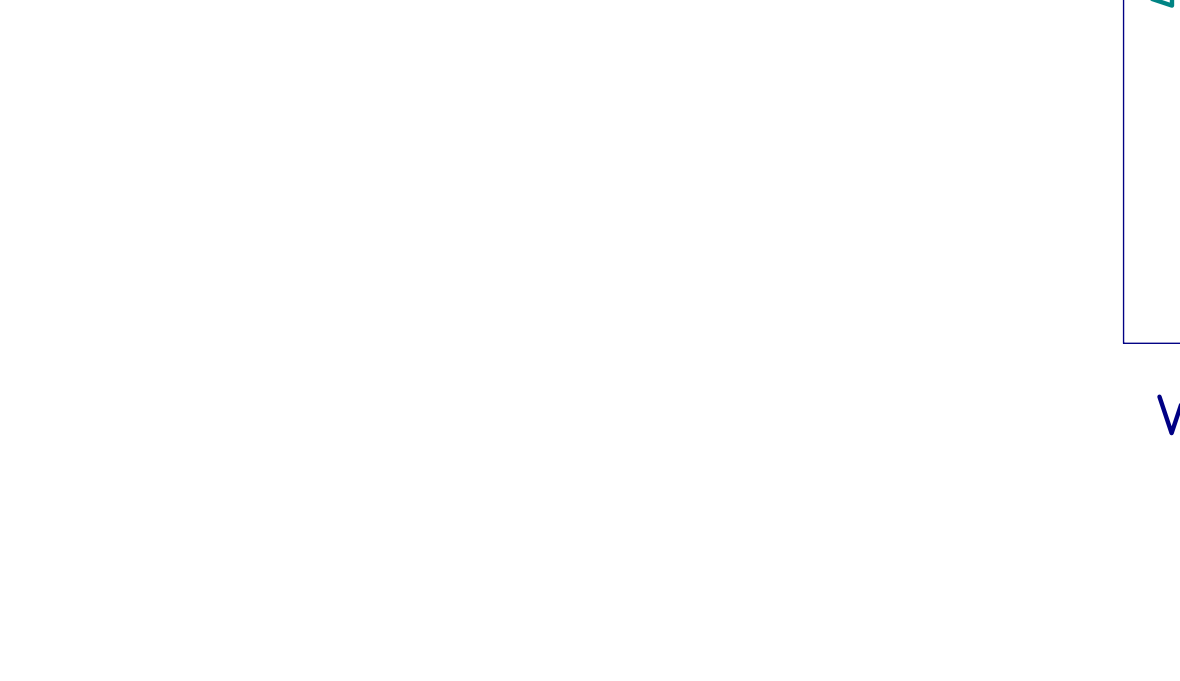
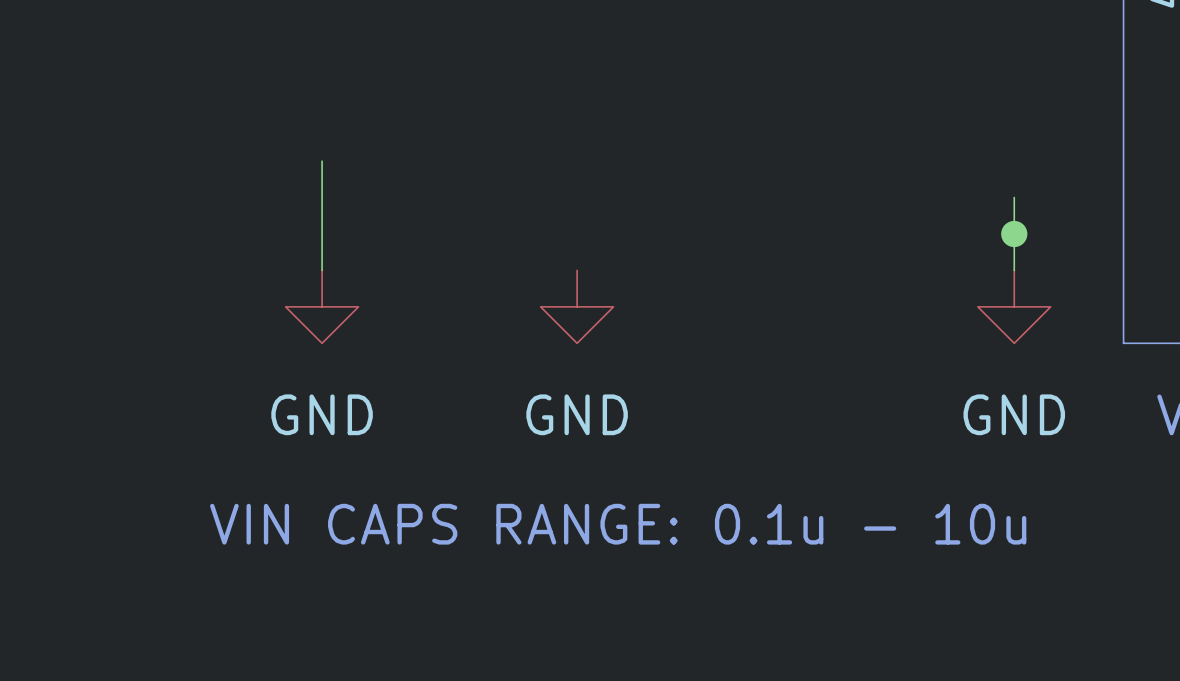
wire: none -> (322, 161) (322, 270)
wire: none -> (1014, 197) (1014, 270)
junction: none -> (1014, 234)
power symbol: none -> GND (322, 306)
power symbol: none -> GND (577, 306)
power symbol: none -> GND (1014, 306)
text: none -> VIN CAPS RANGE: 0.1u - 10u (618, 524)

